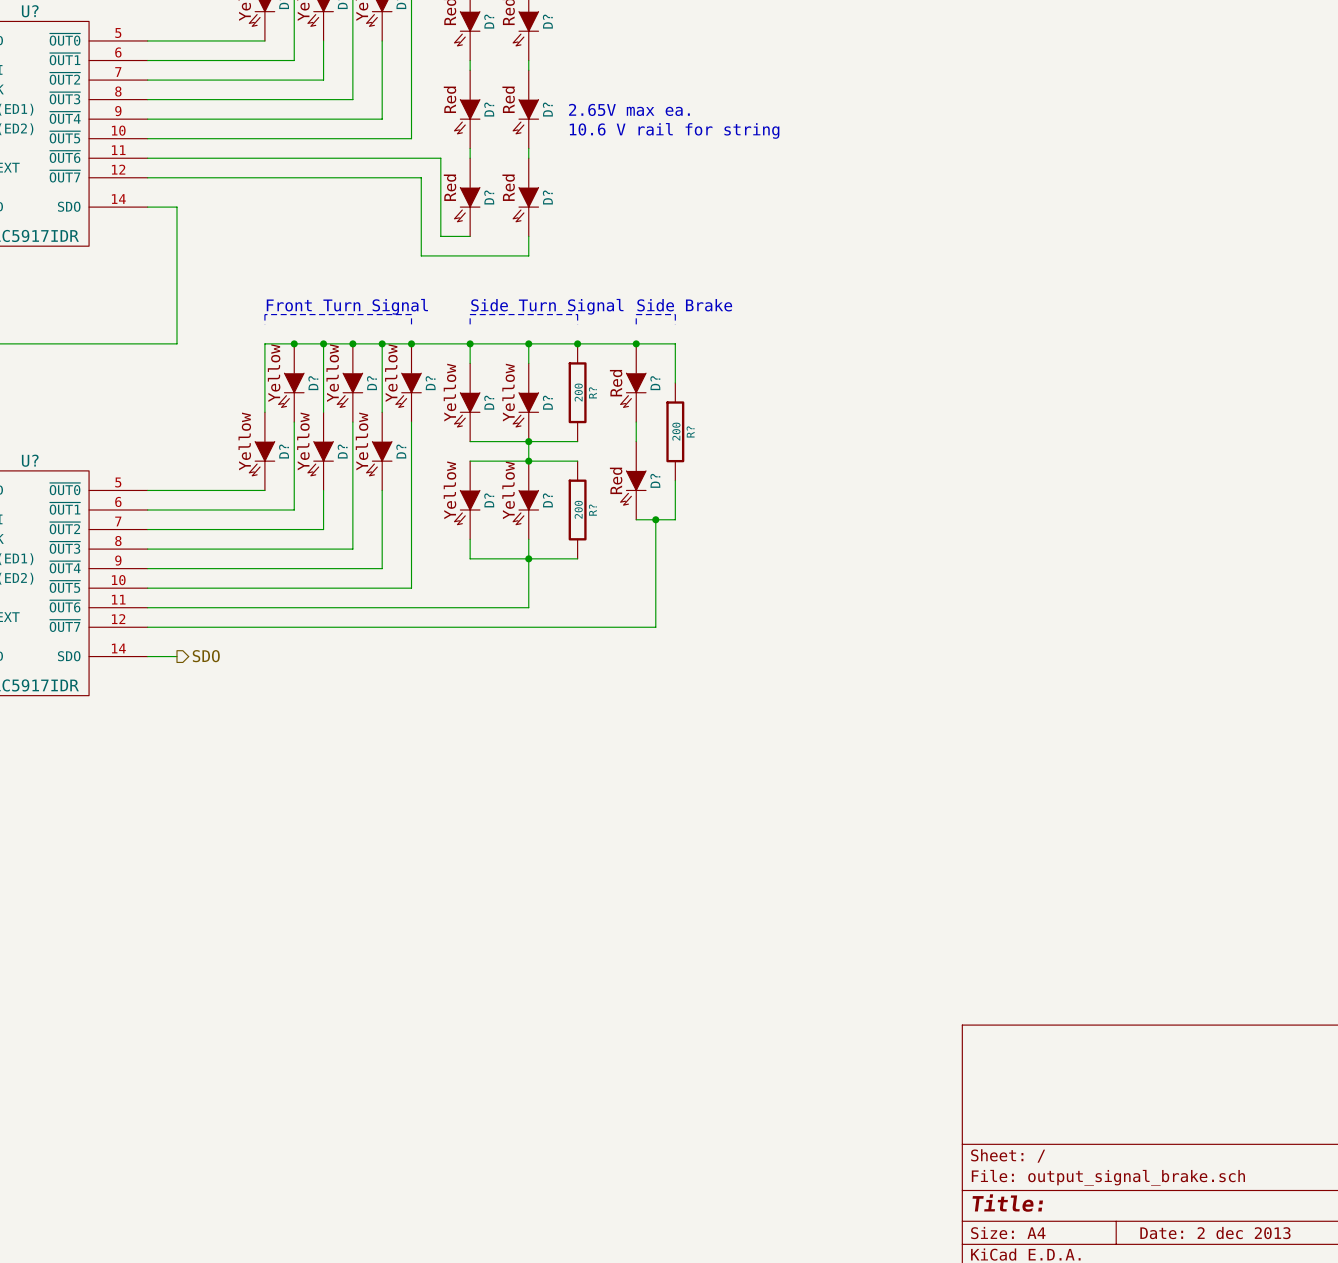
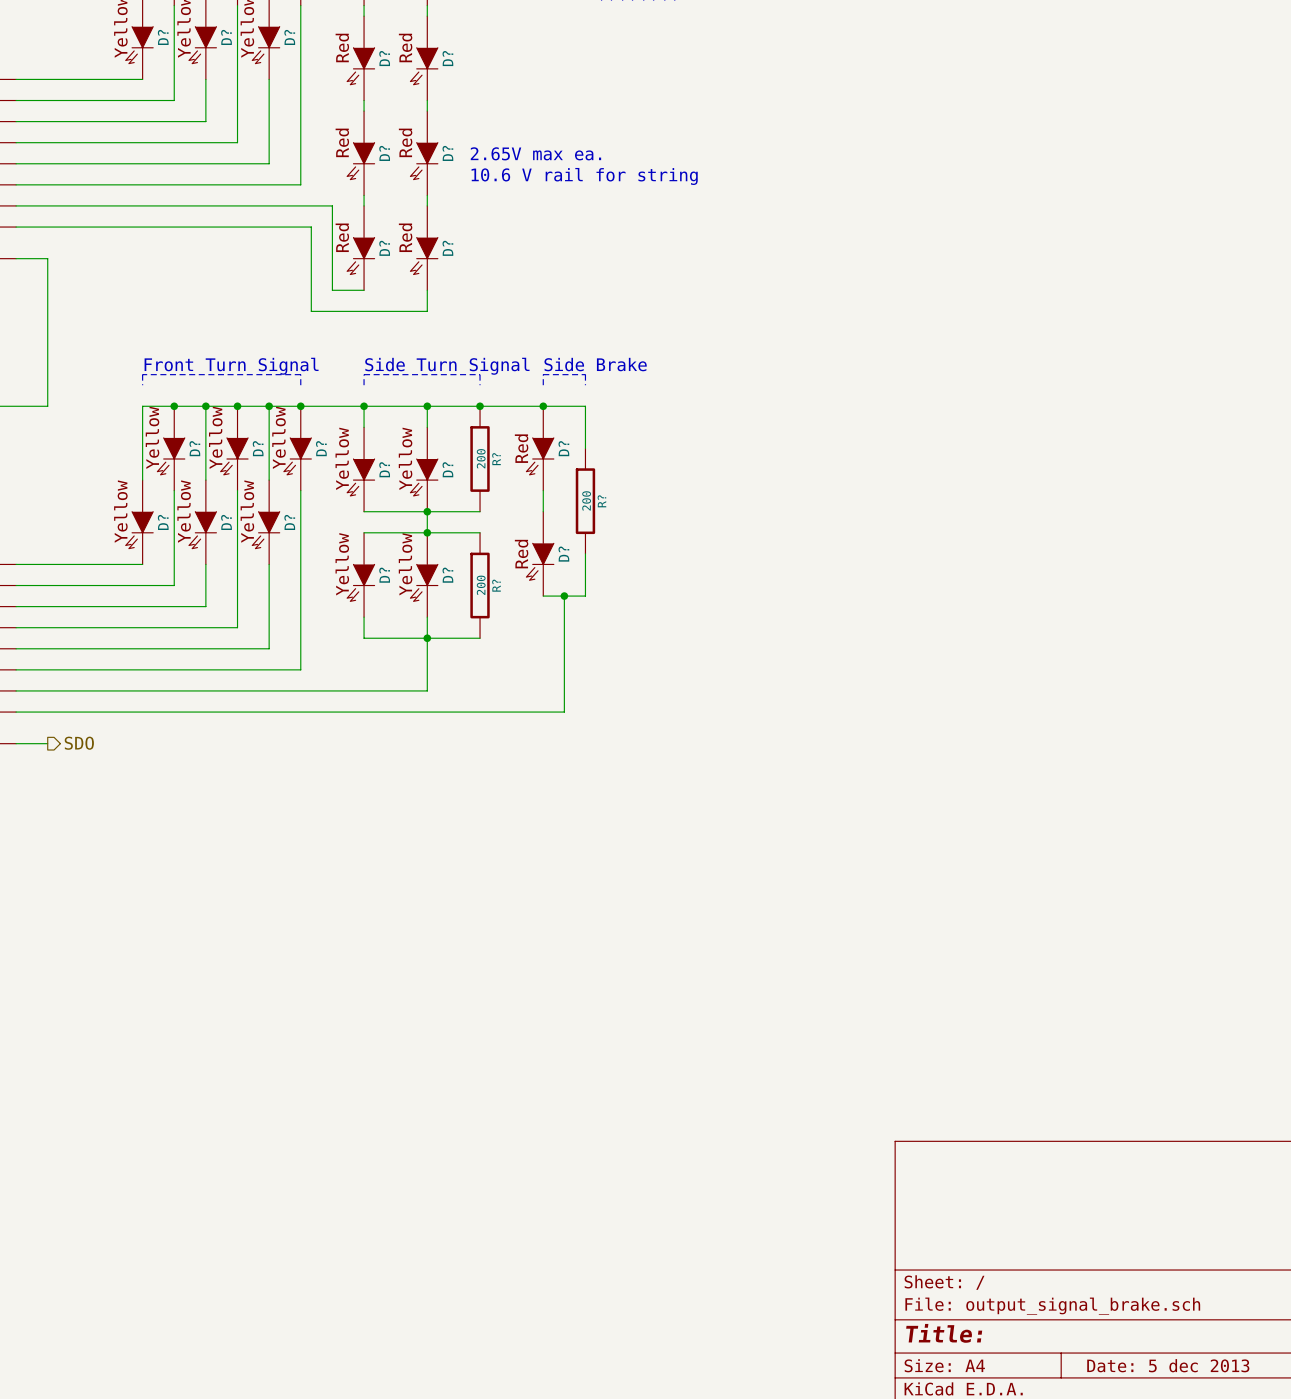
title block: Date: 2 dec 2013 (1215, 1233) -> Date: 5 dec 2013 (1168, 1365)

